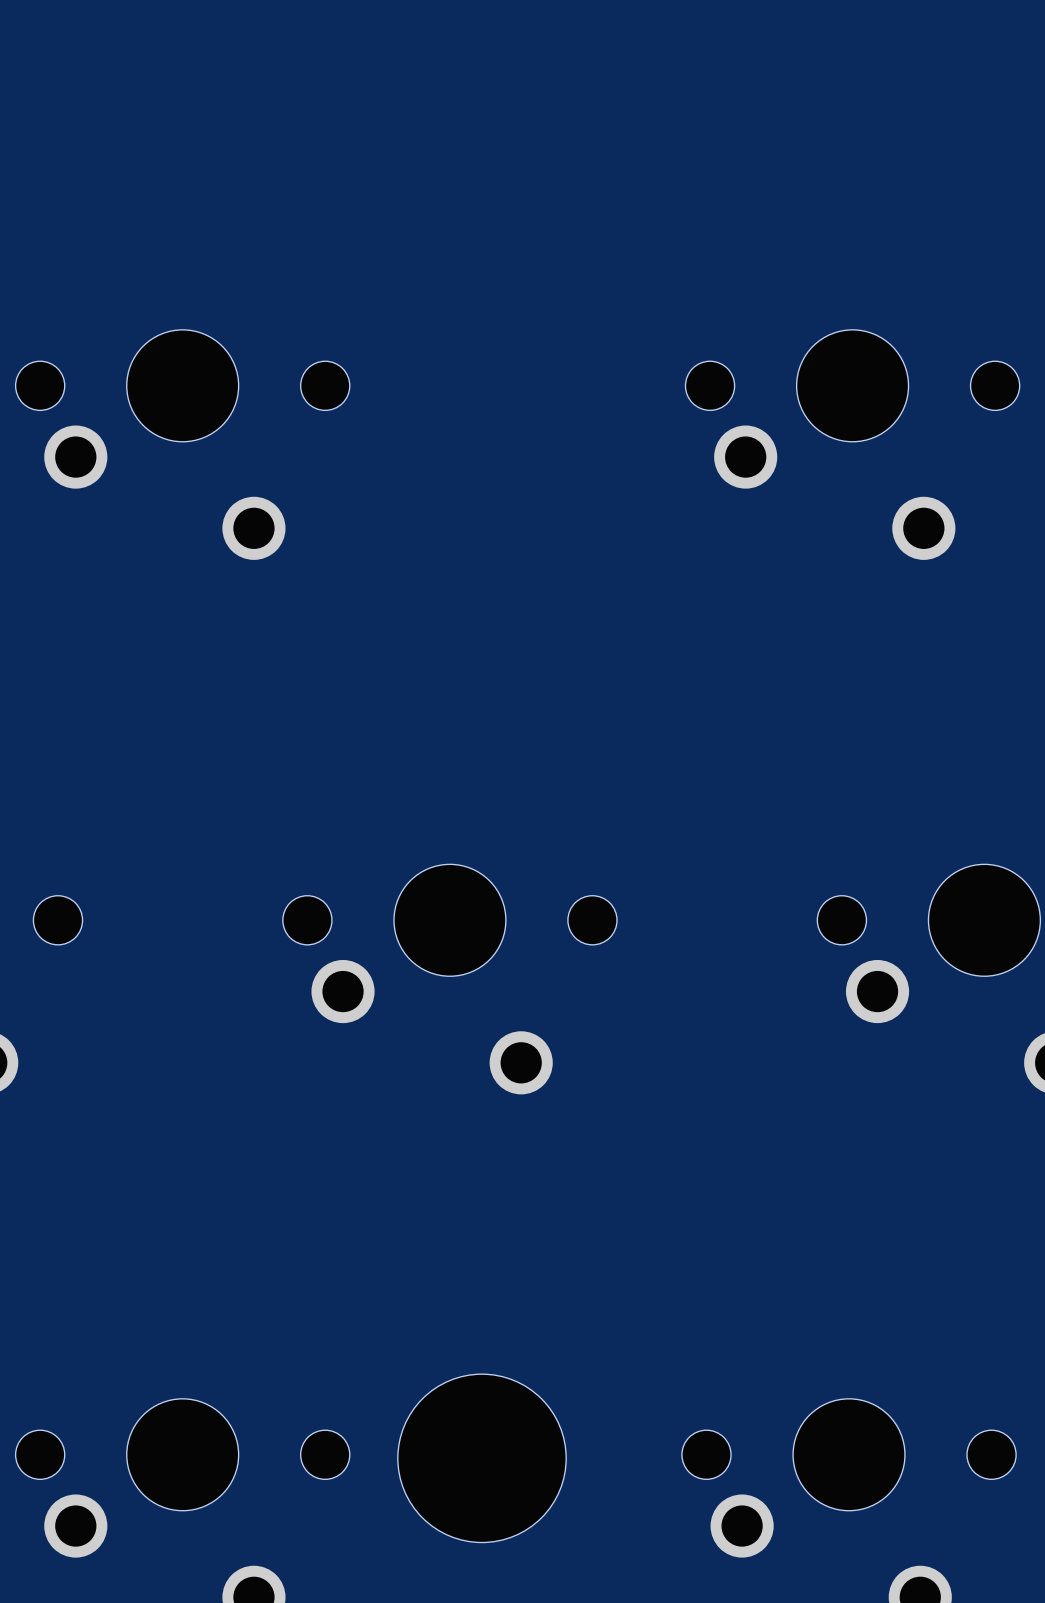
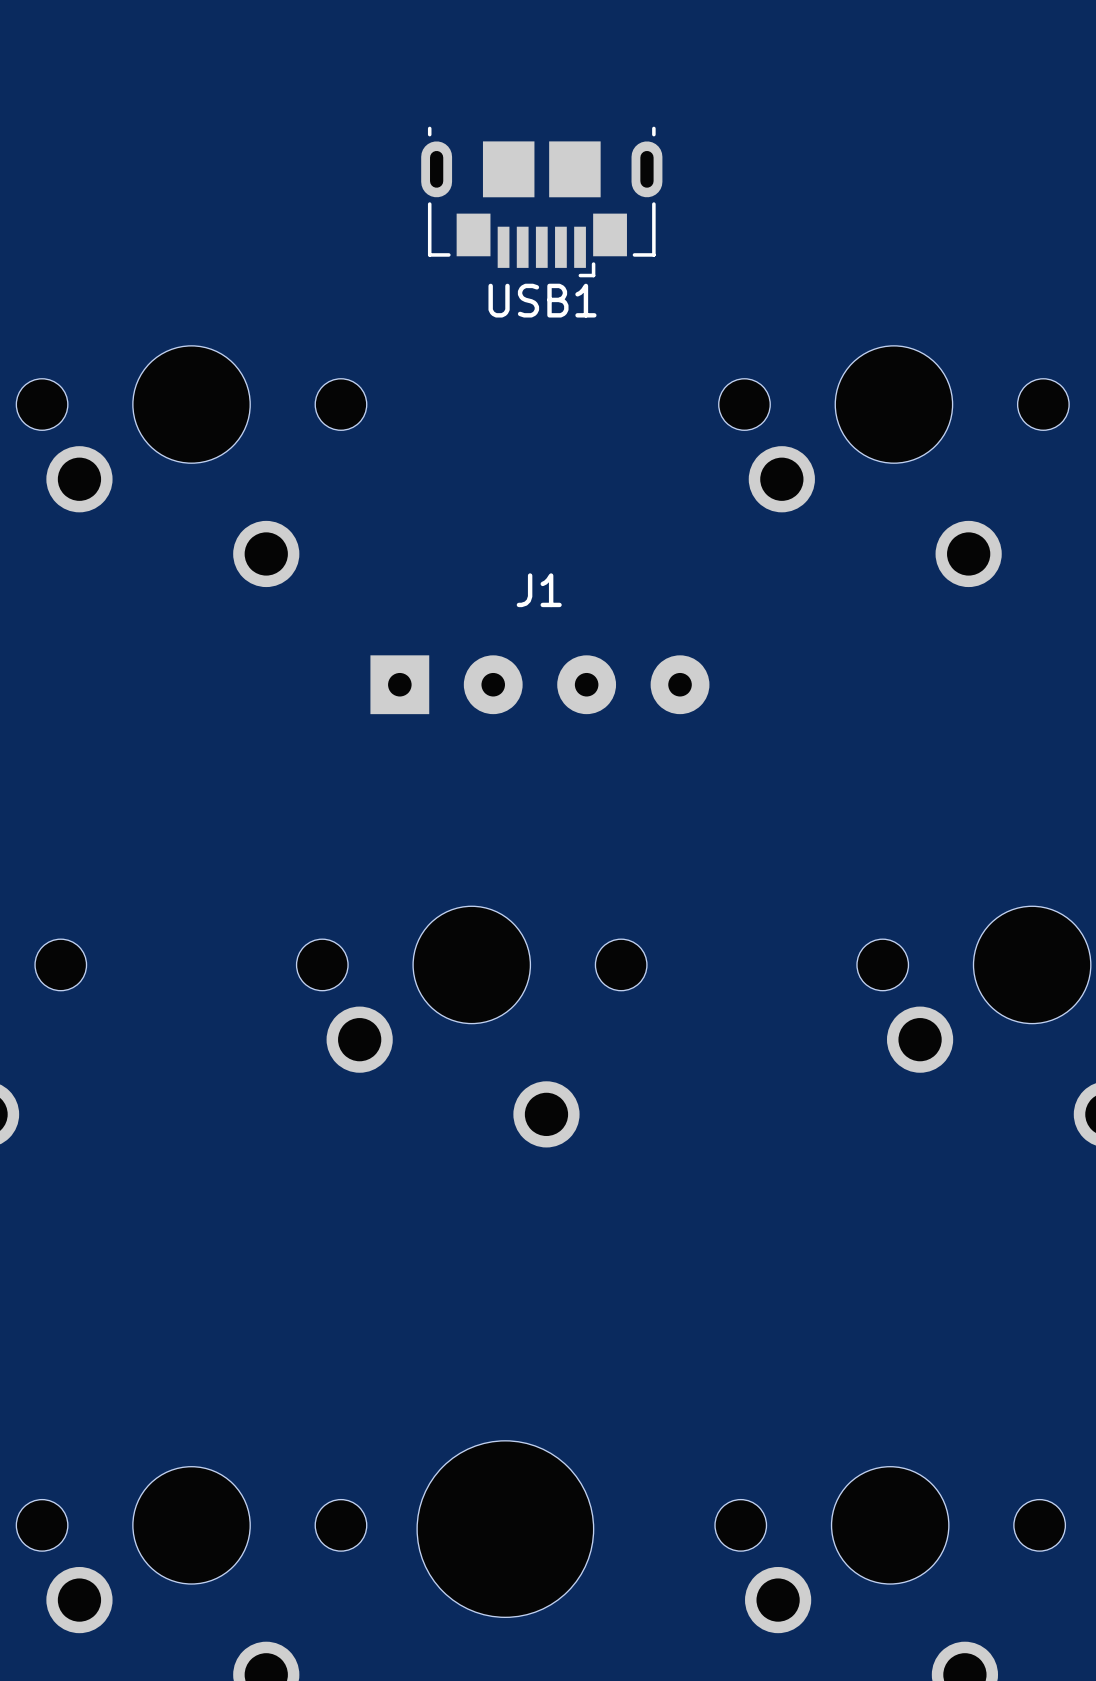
USB1: none -> (541, 202)
J1: none -> (539, 684)

